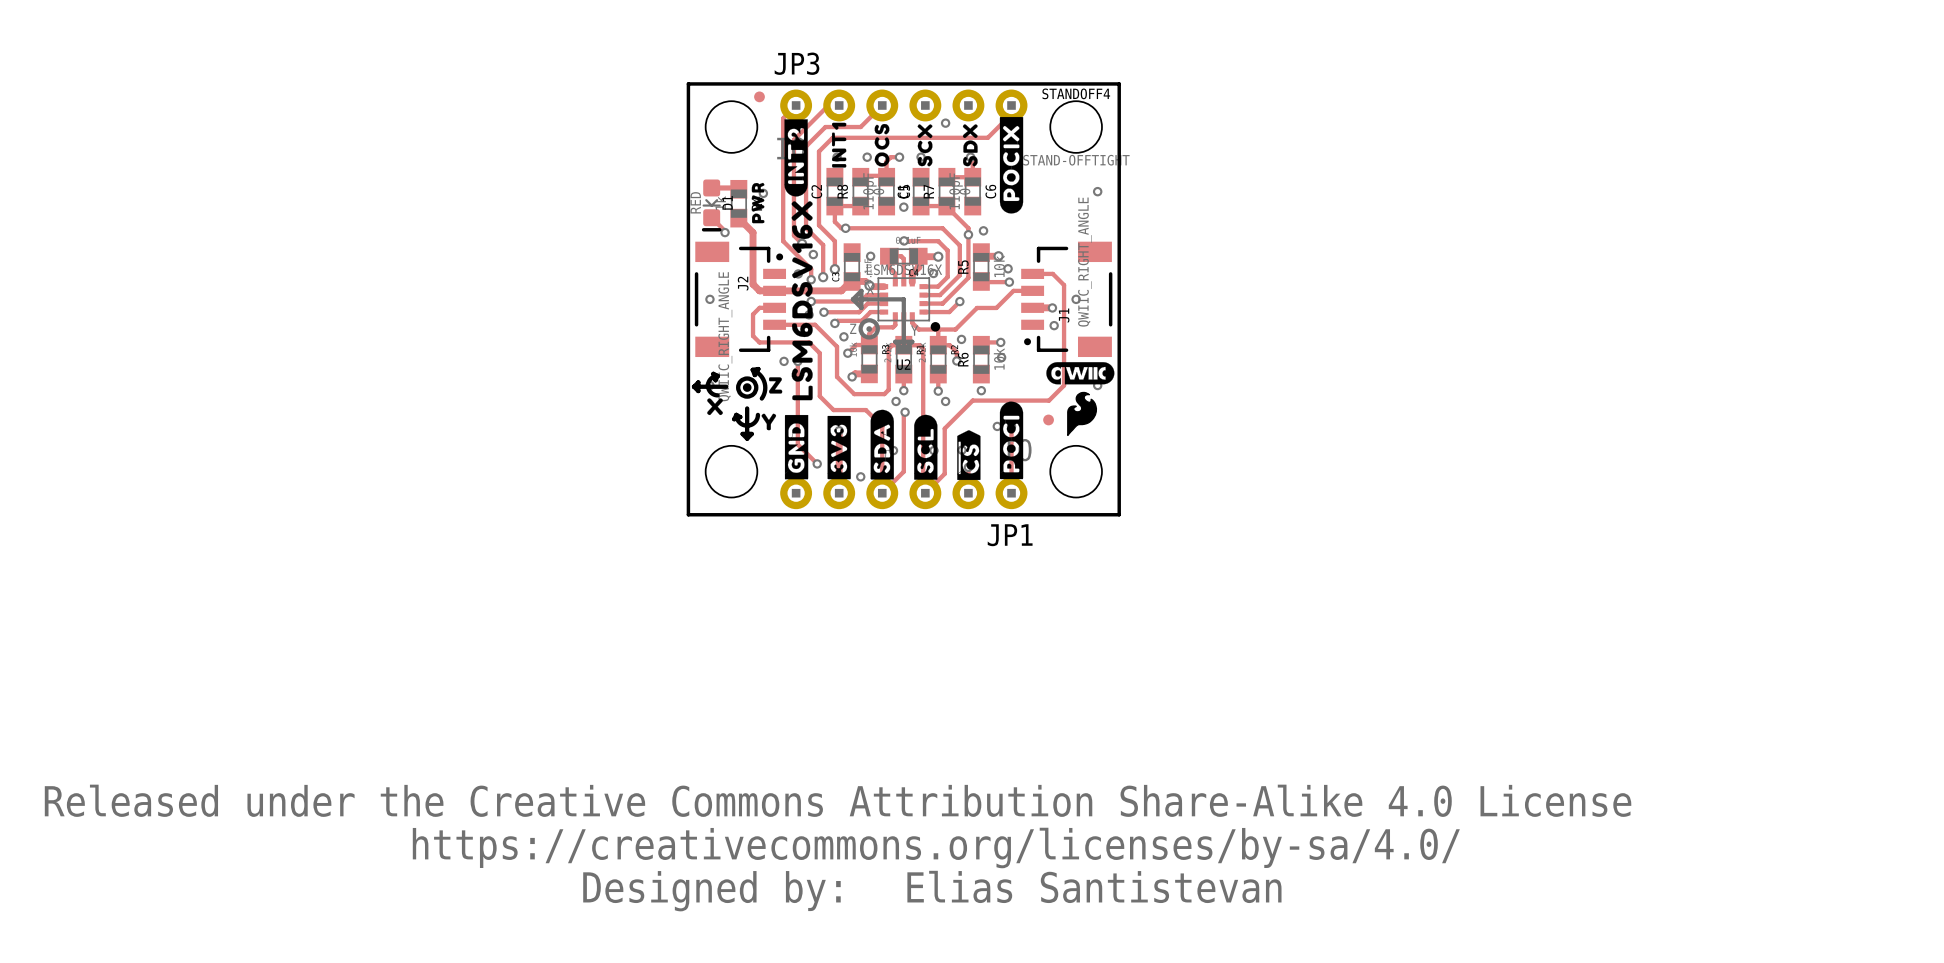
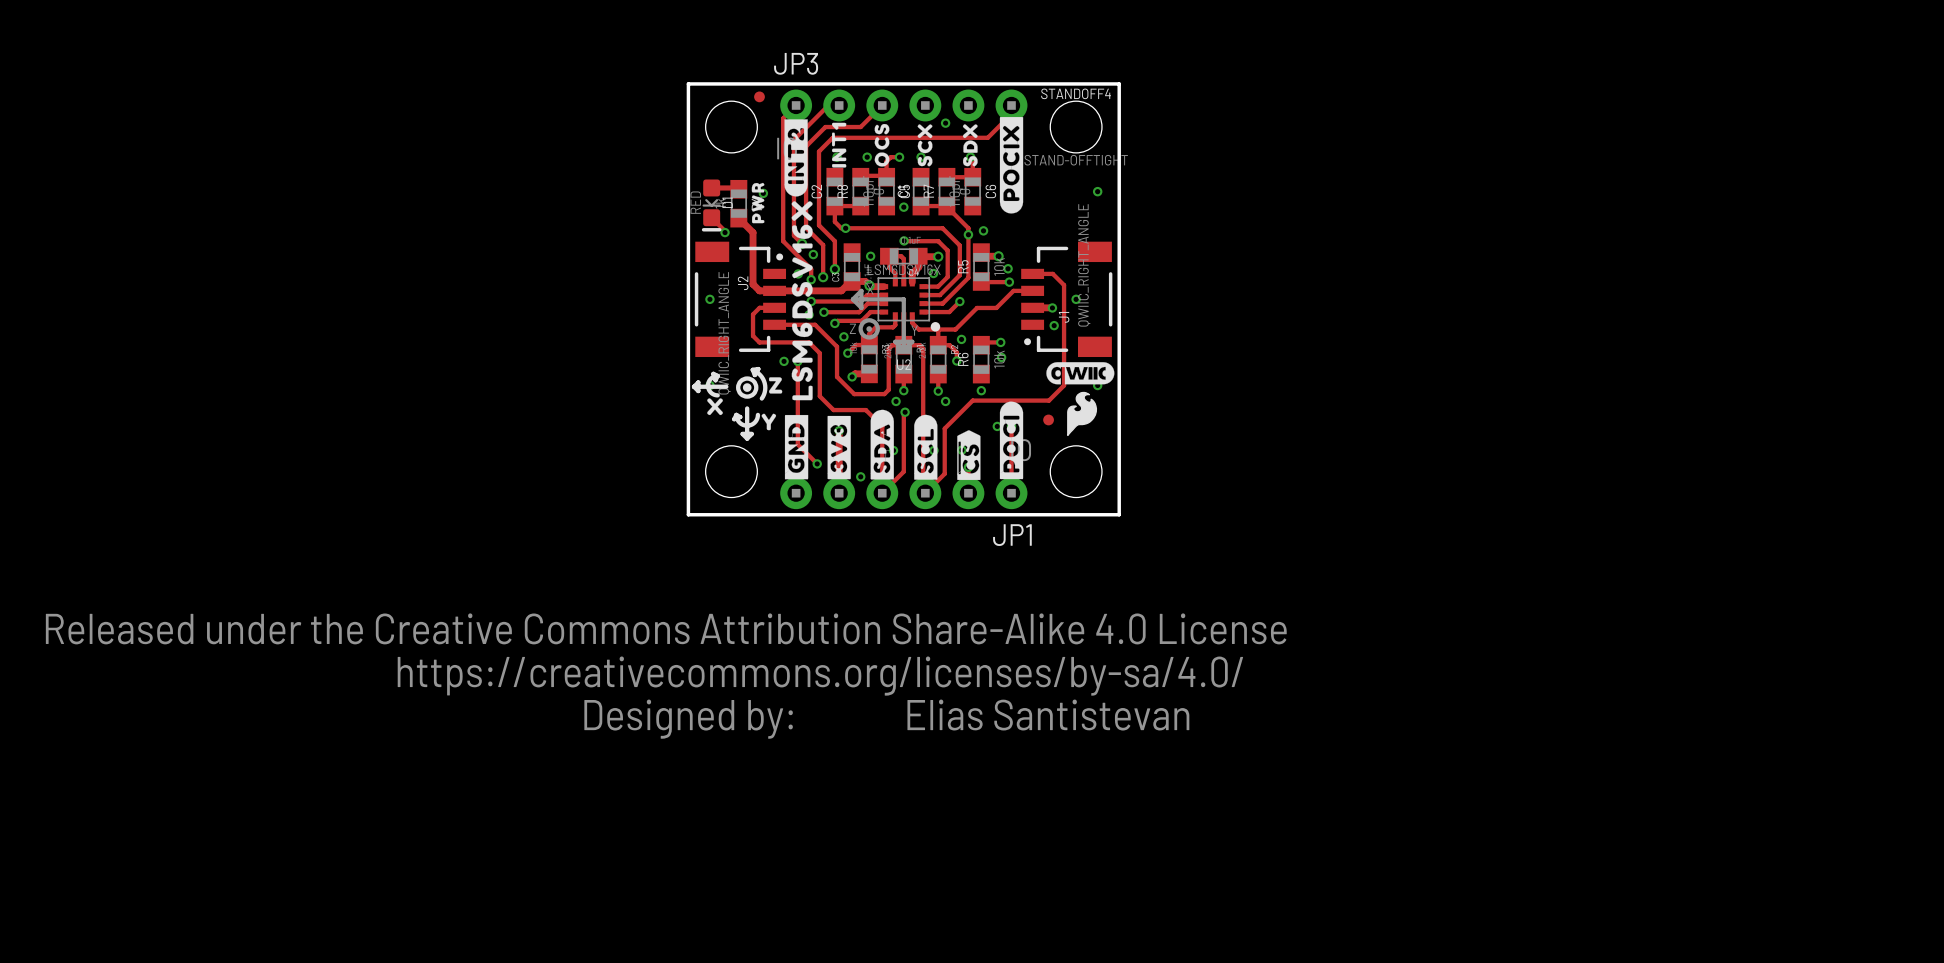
drawing position: (838, 848) -> (666, 676)
text position: Elias Santistevan (1094, 886) -> Elias Santistevan (1048, 715)

